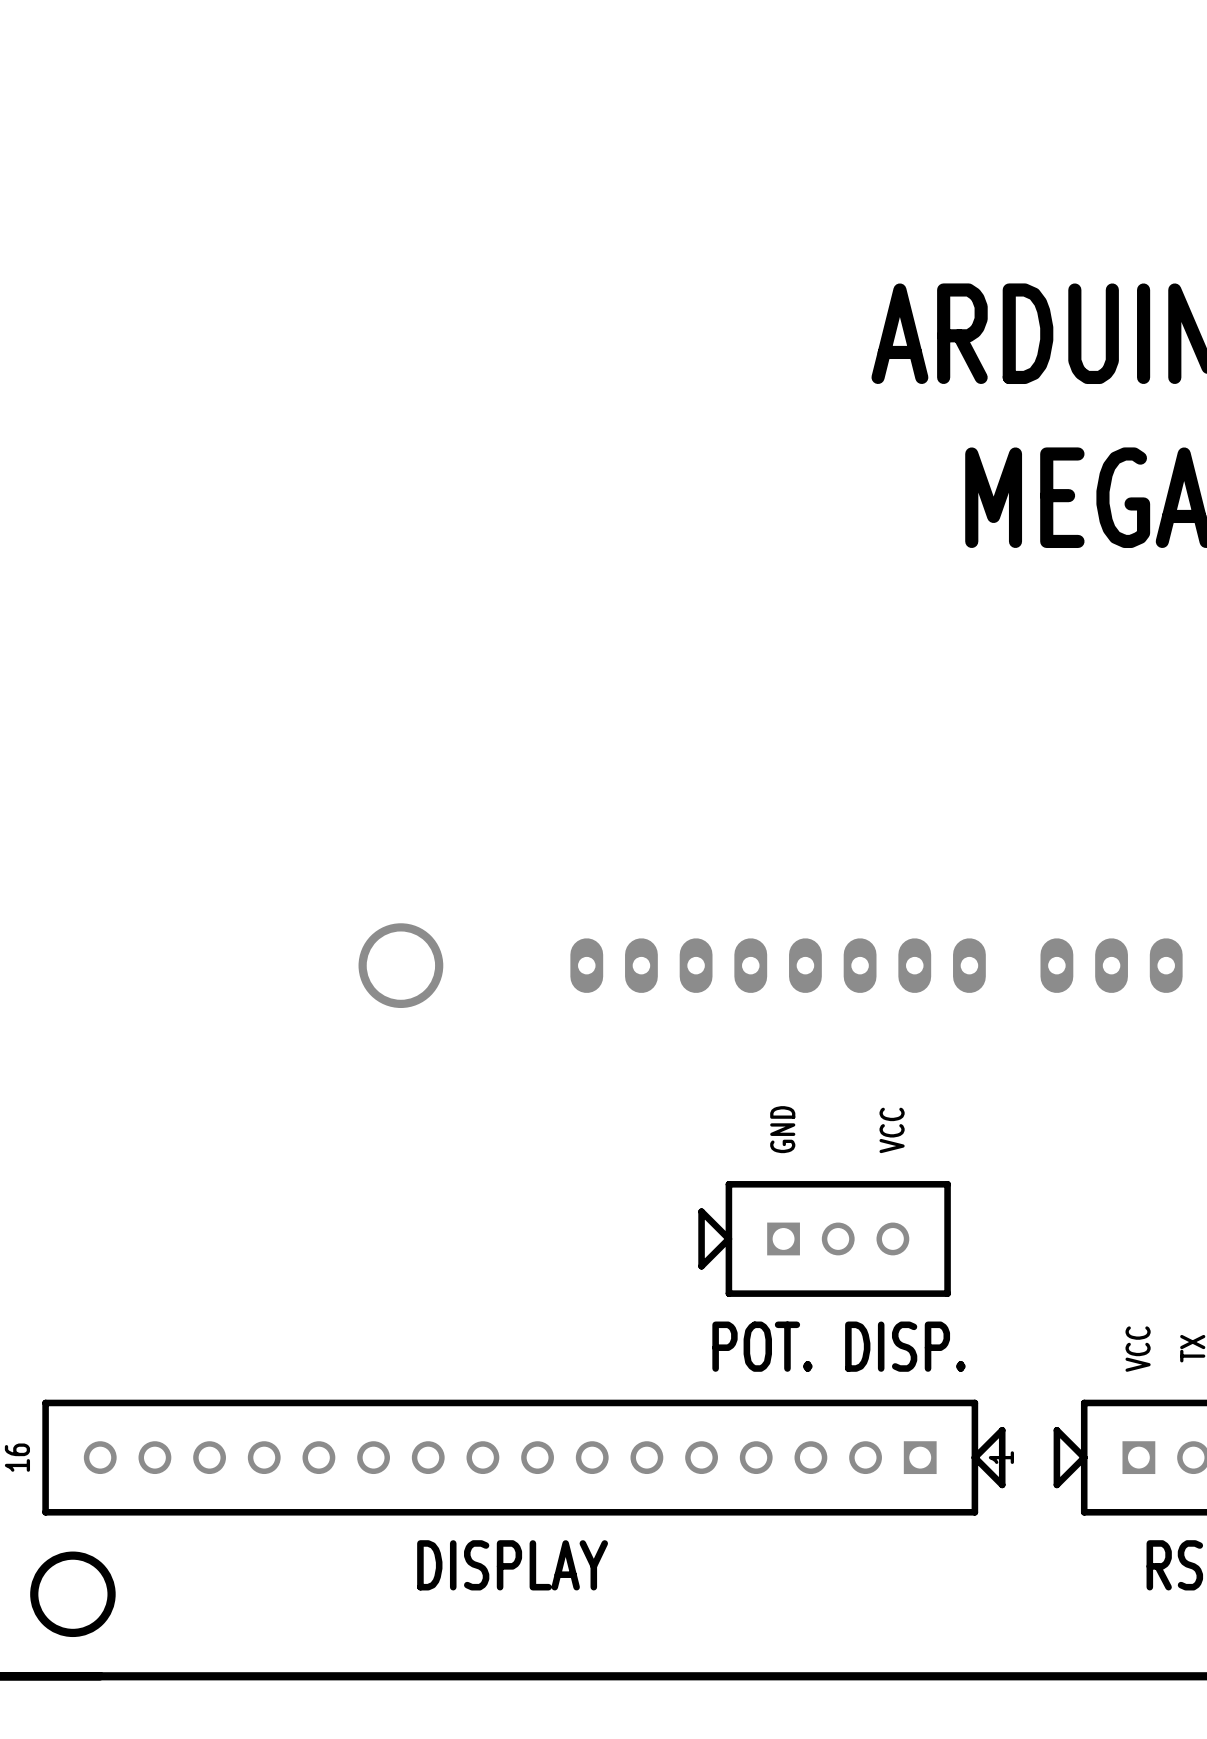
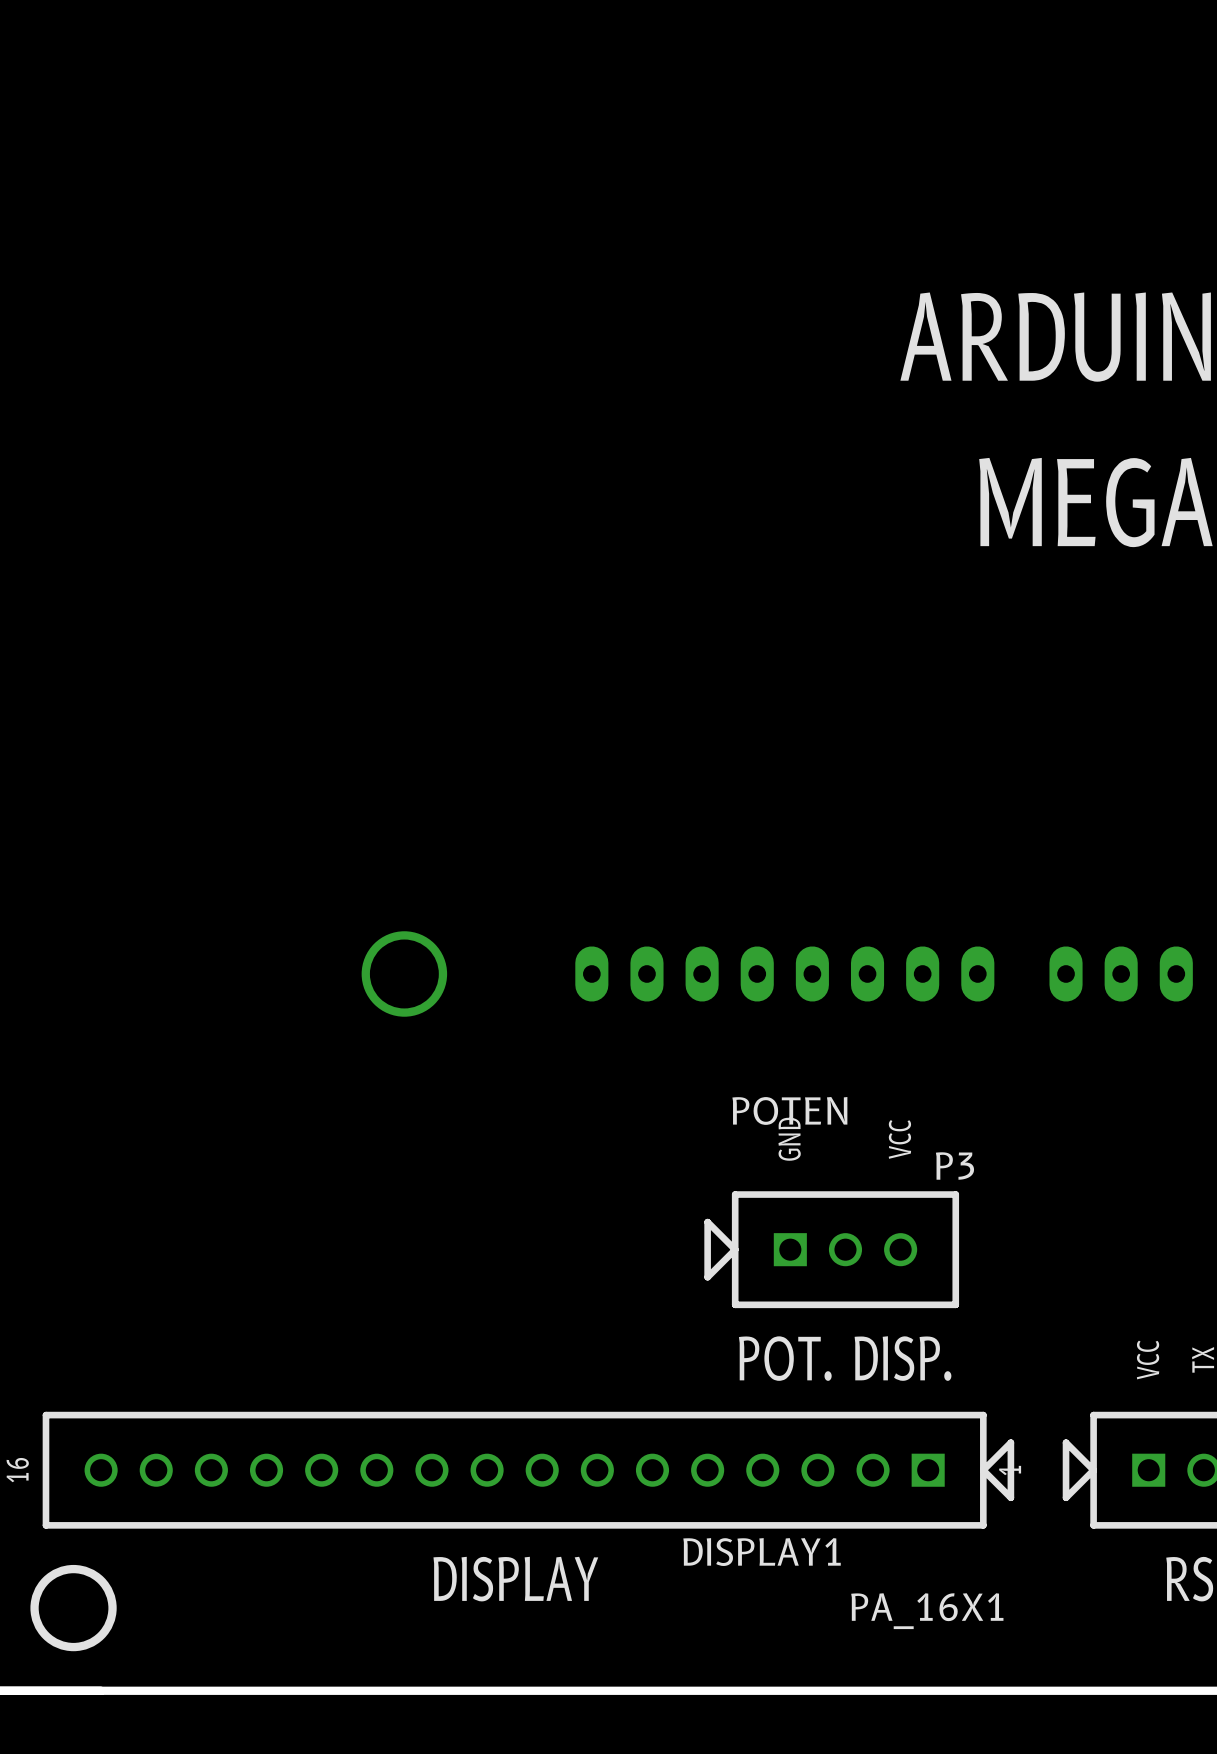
P3 value: none -> POTEN (789, 1110)
P3 name: none -> P3 (954, 1166)
DISPLAY1 name: none -> DISPLAY1 (762, 1552)
DISPLAY1 value: none -> PA_16X1 (927, 1611)

